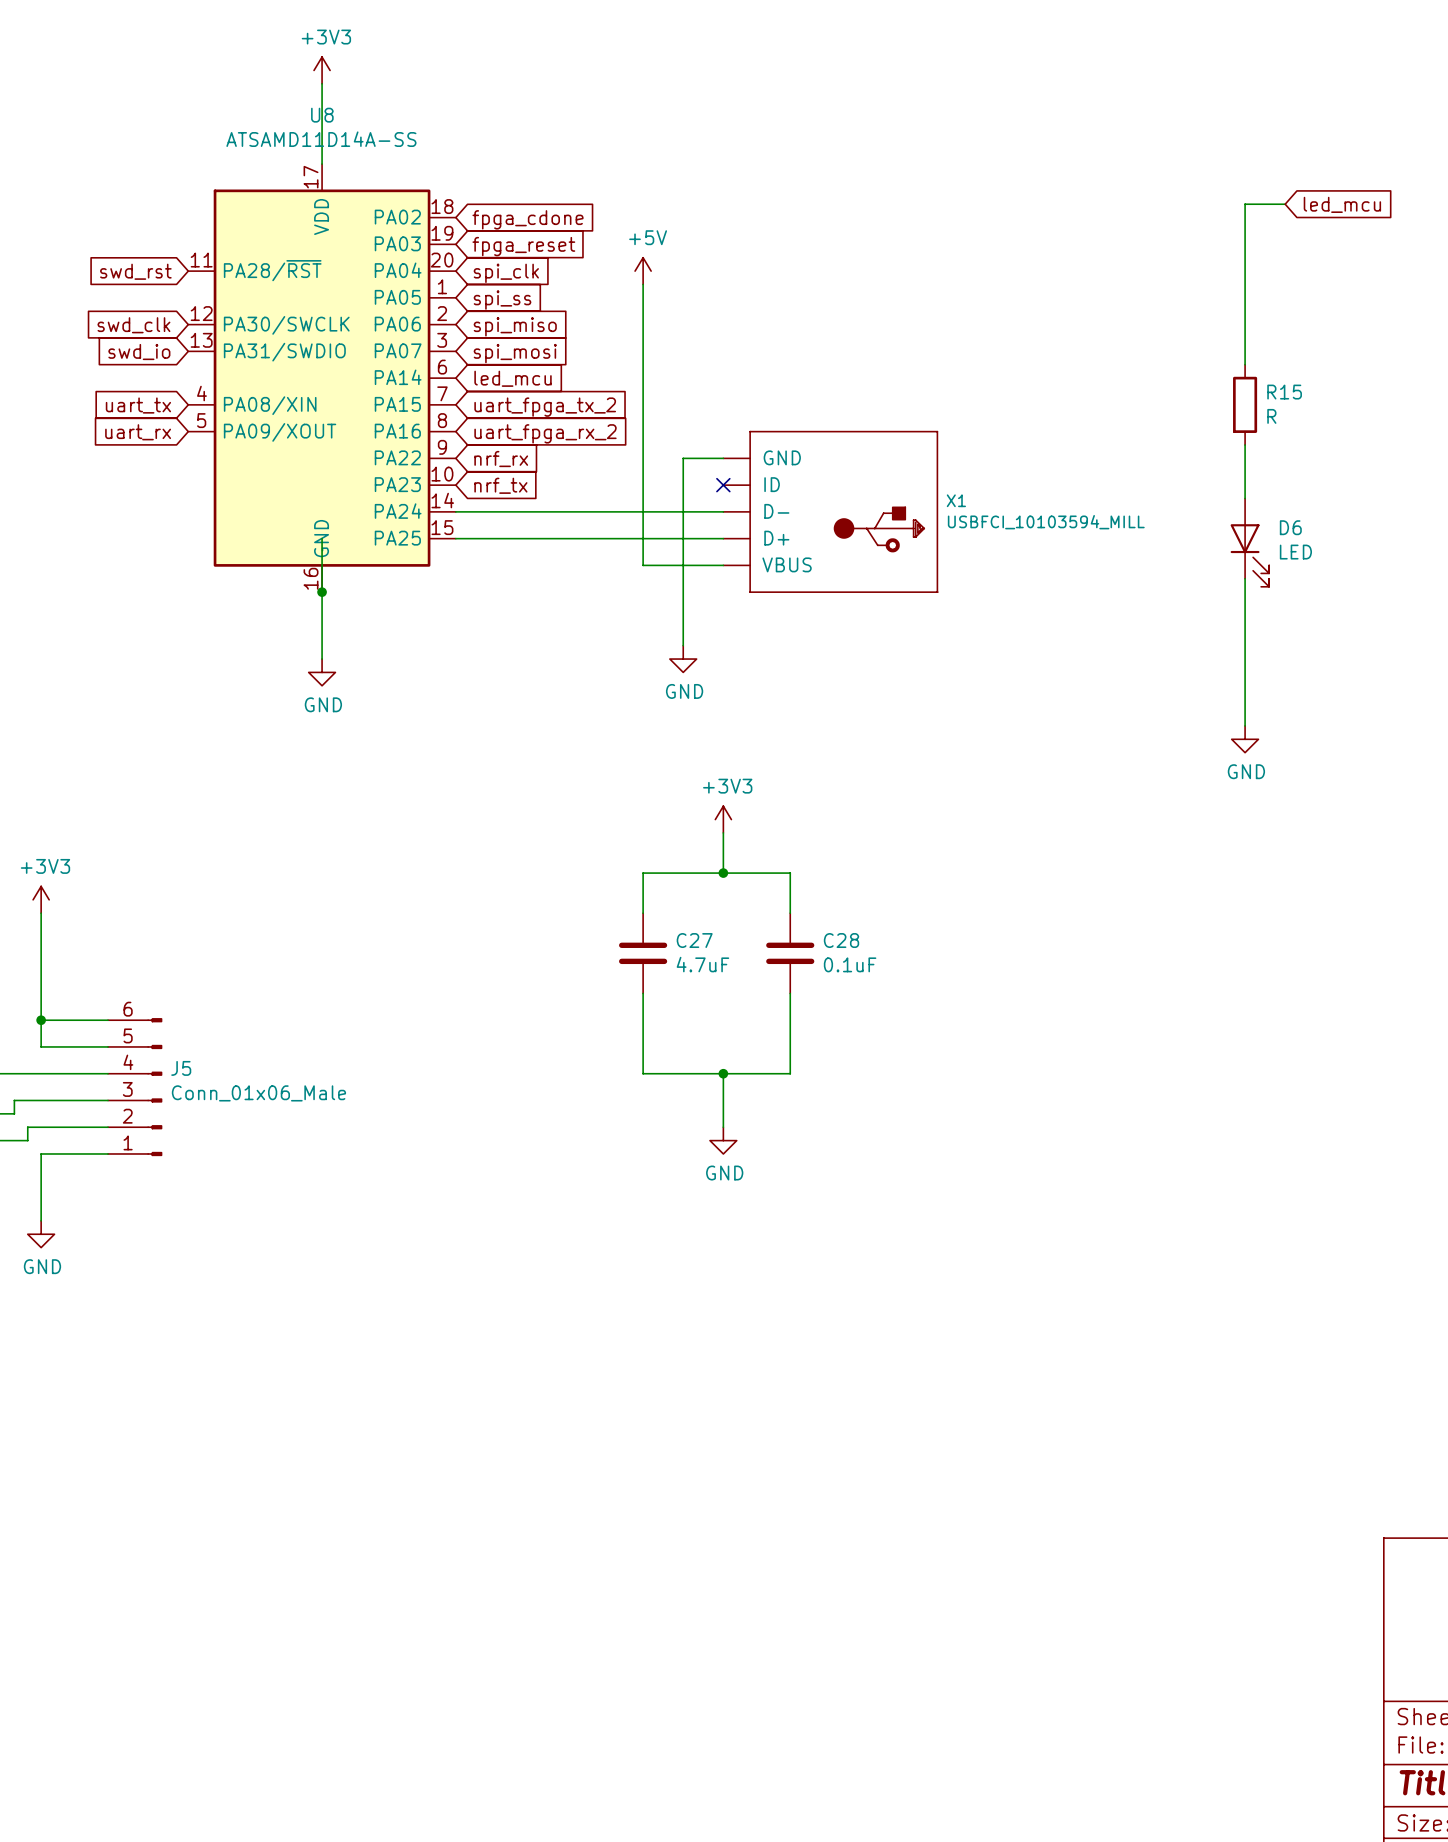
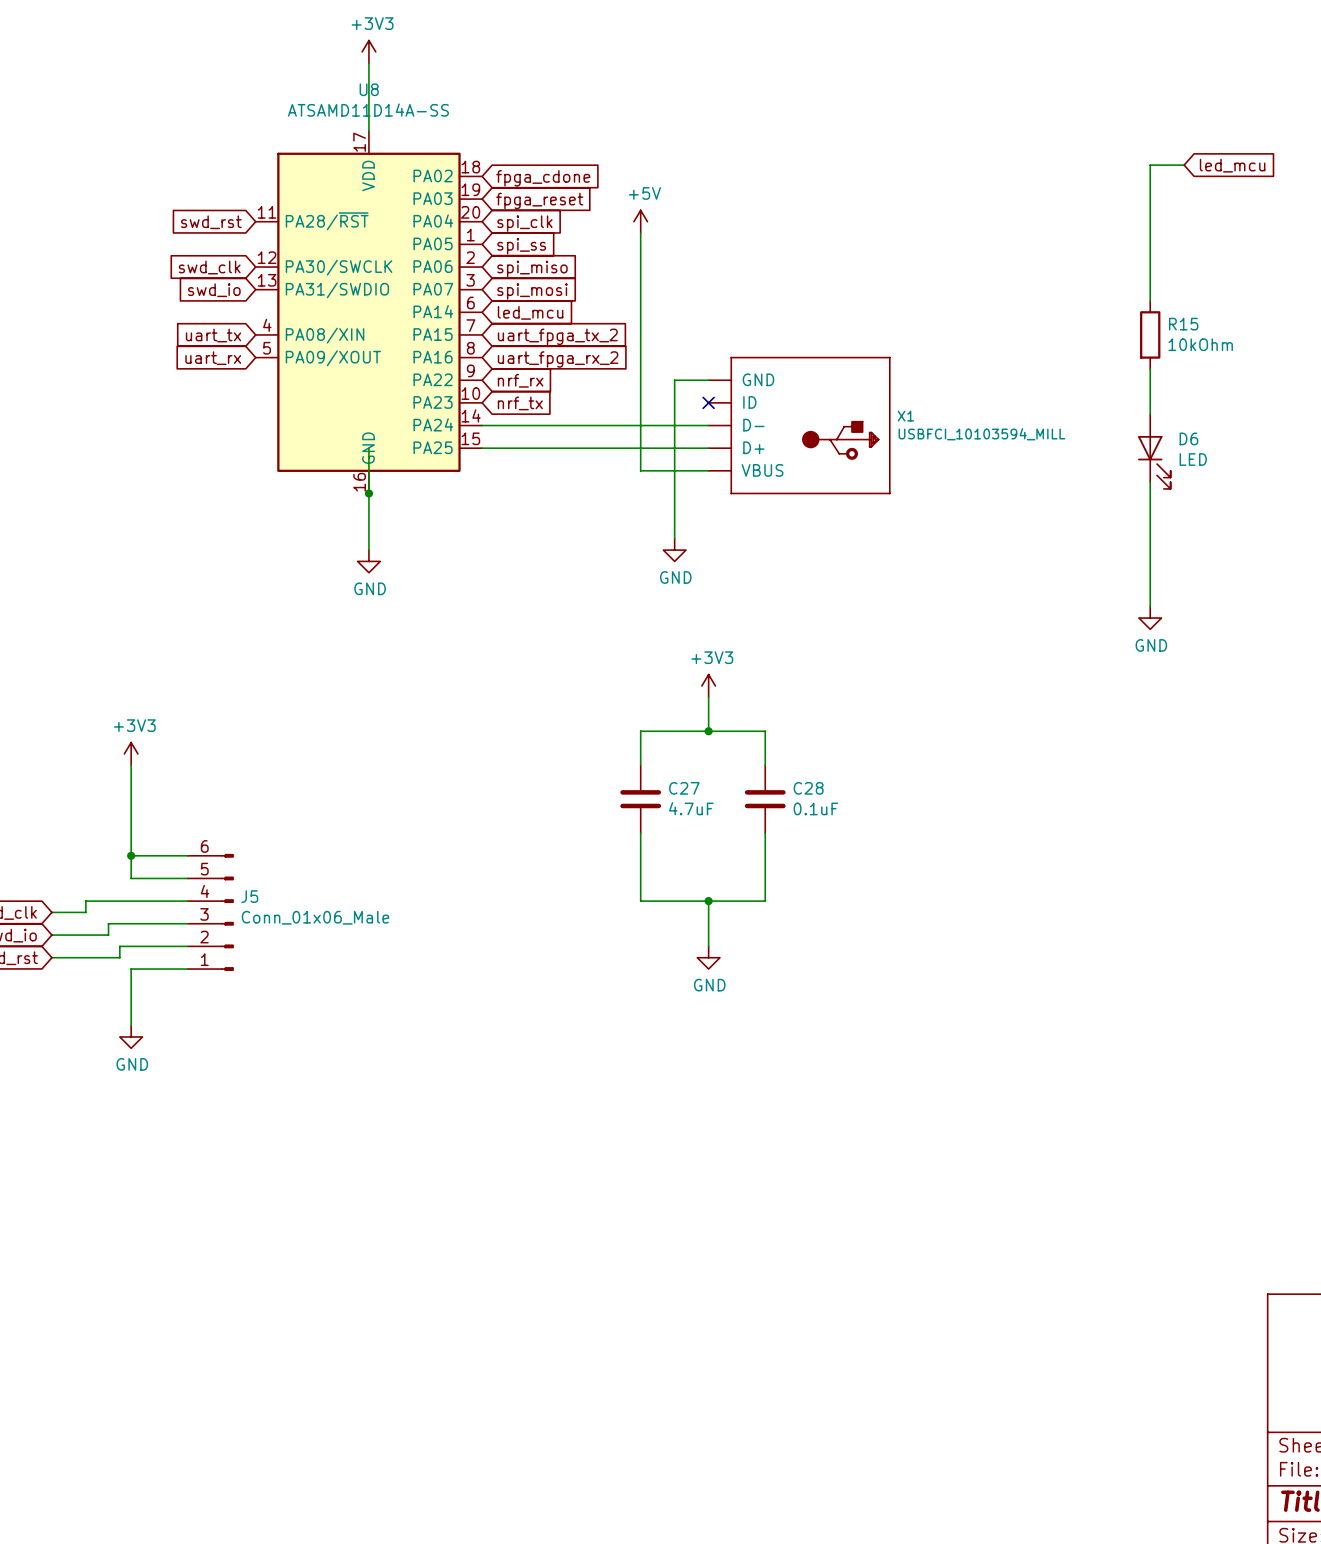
R15 value: R (1271, 416) -> 10kOhm (1200, 344)

